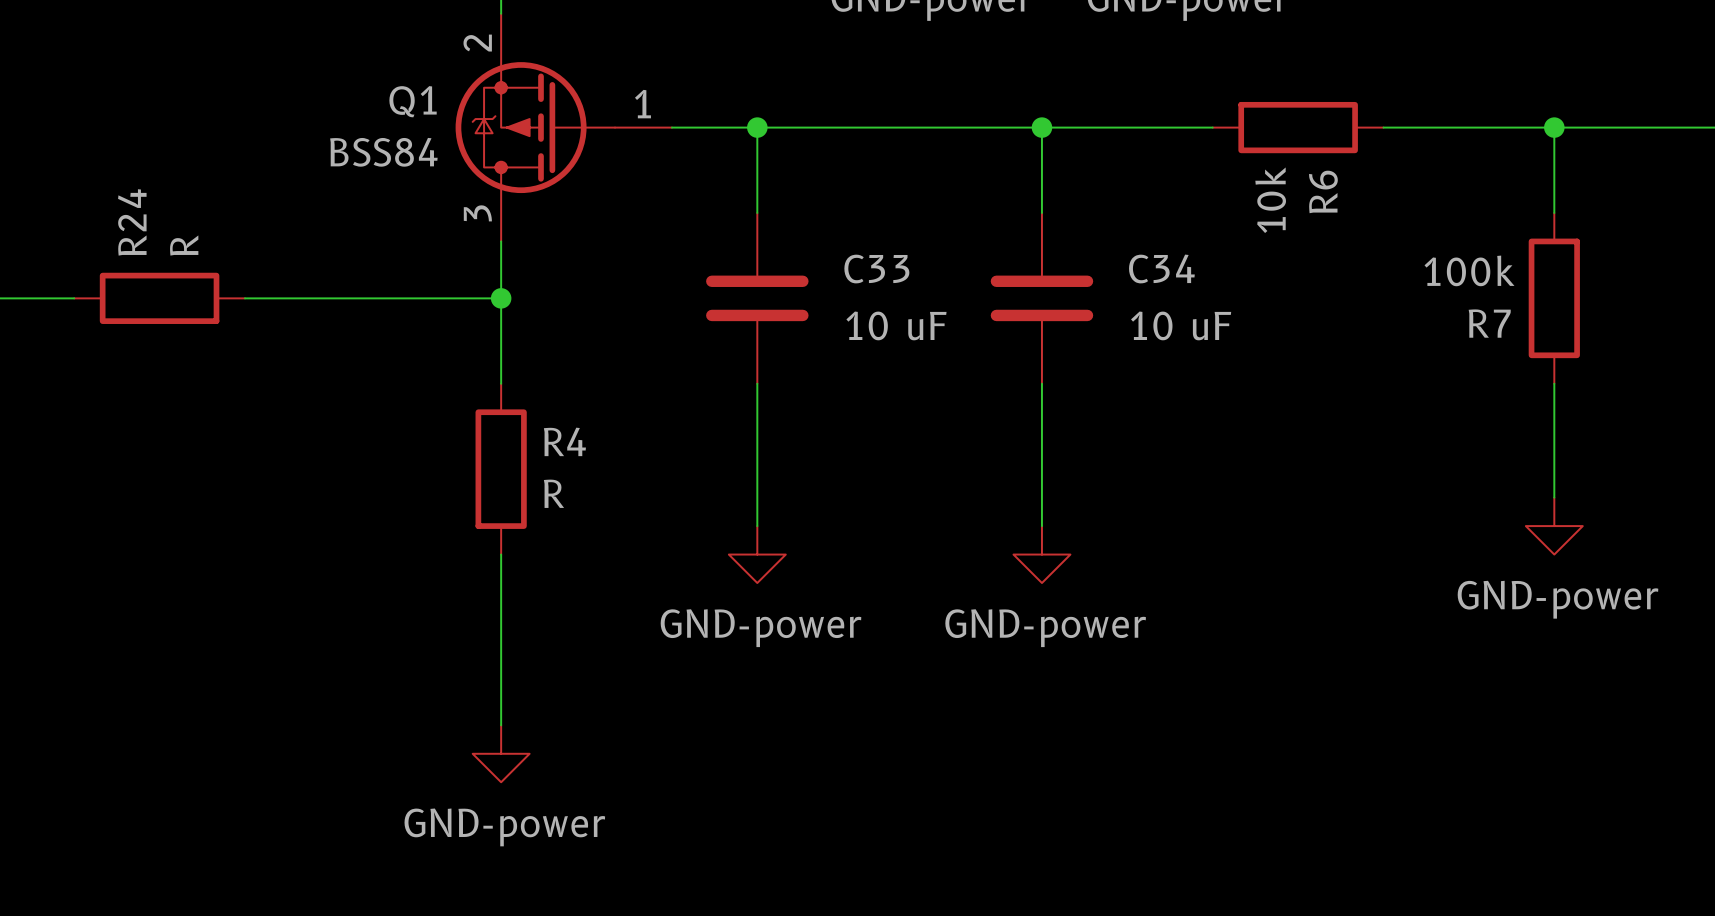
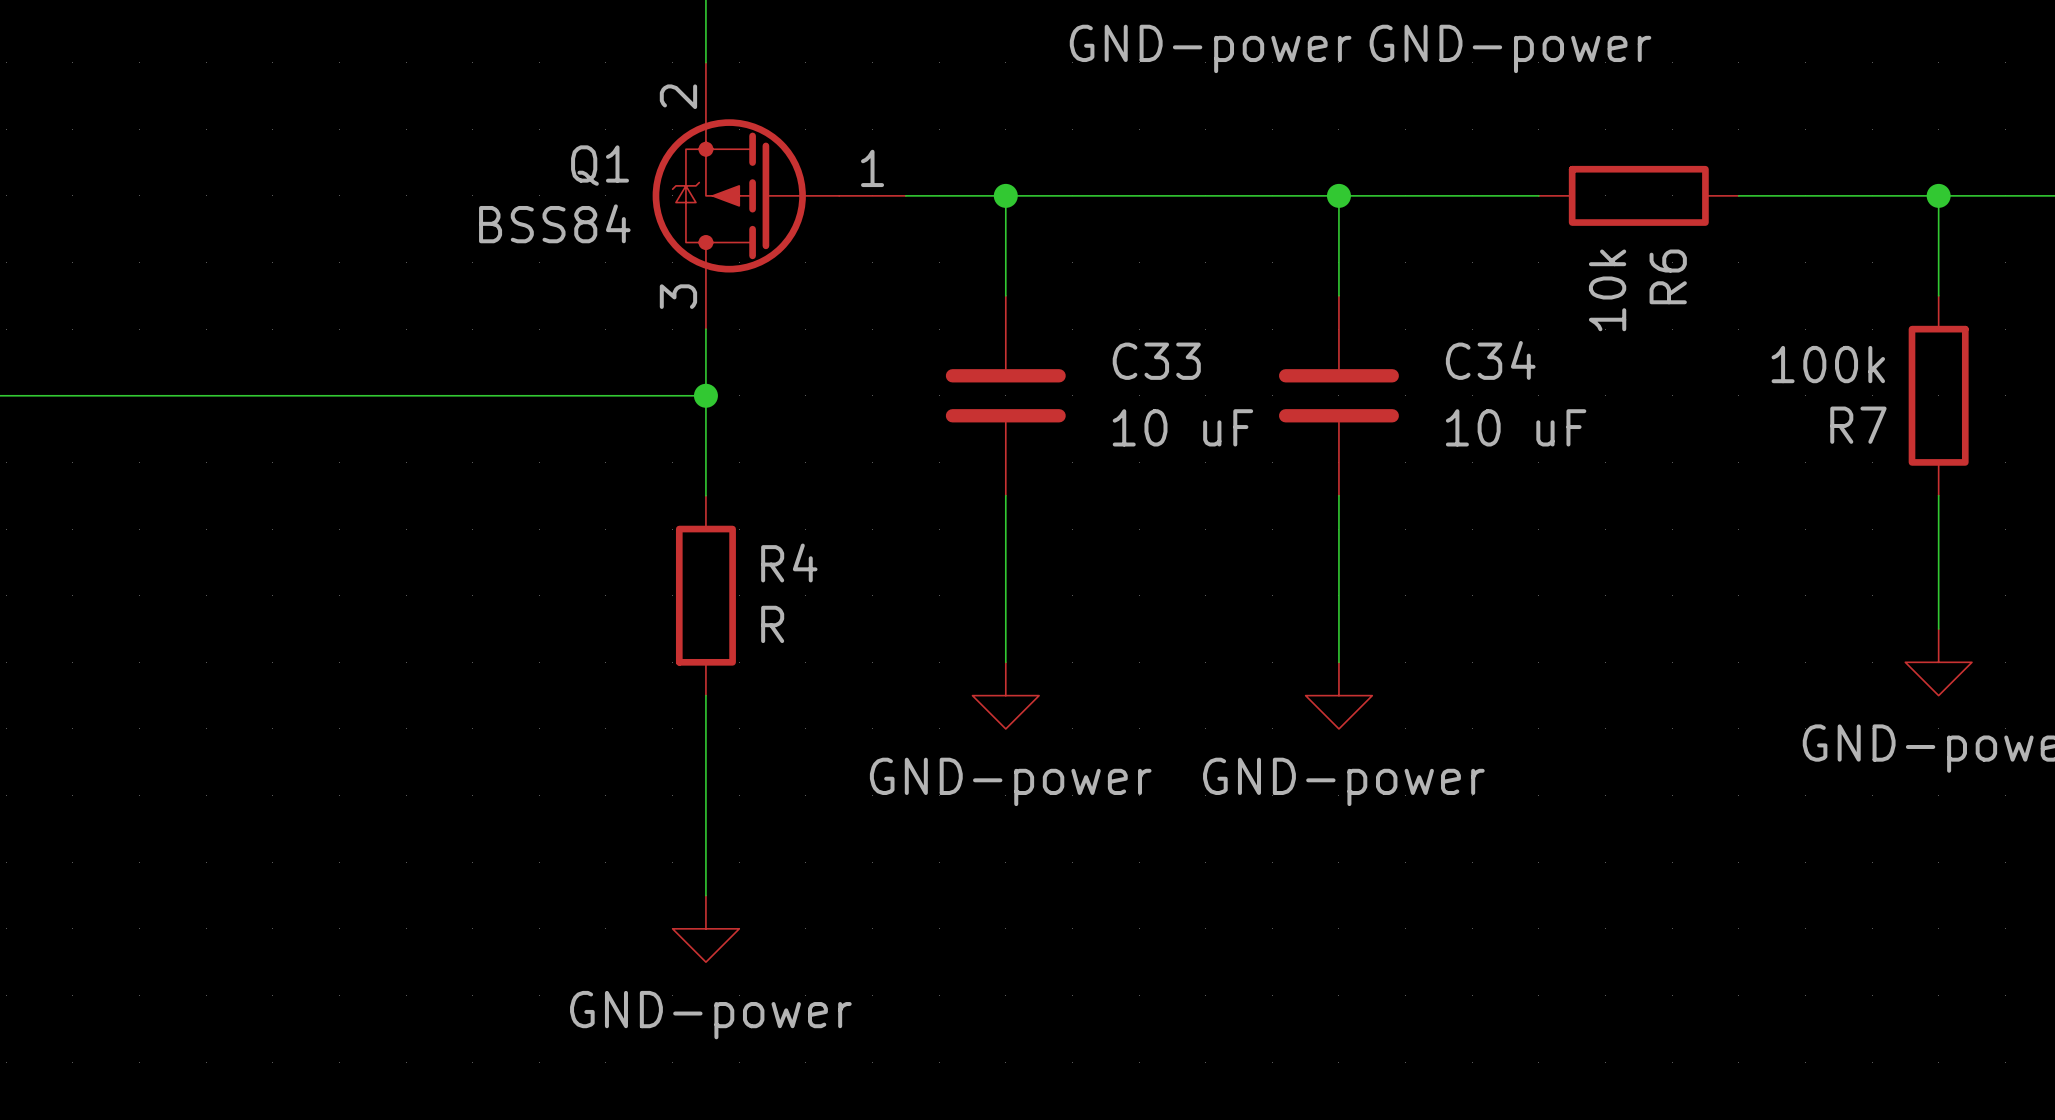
wire: none -> (206, 395) (406, 395)
R24: R (159, 298) -> none

